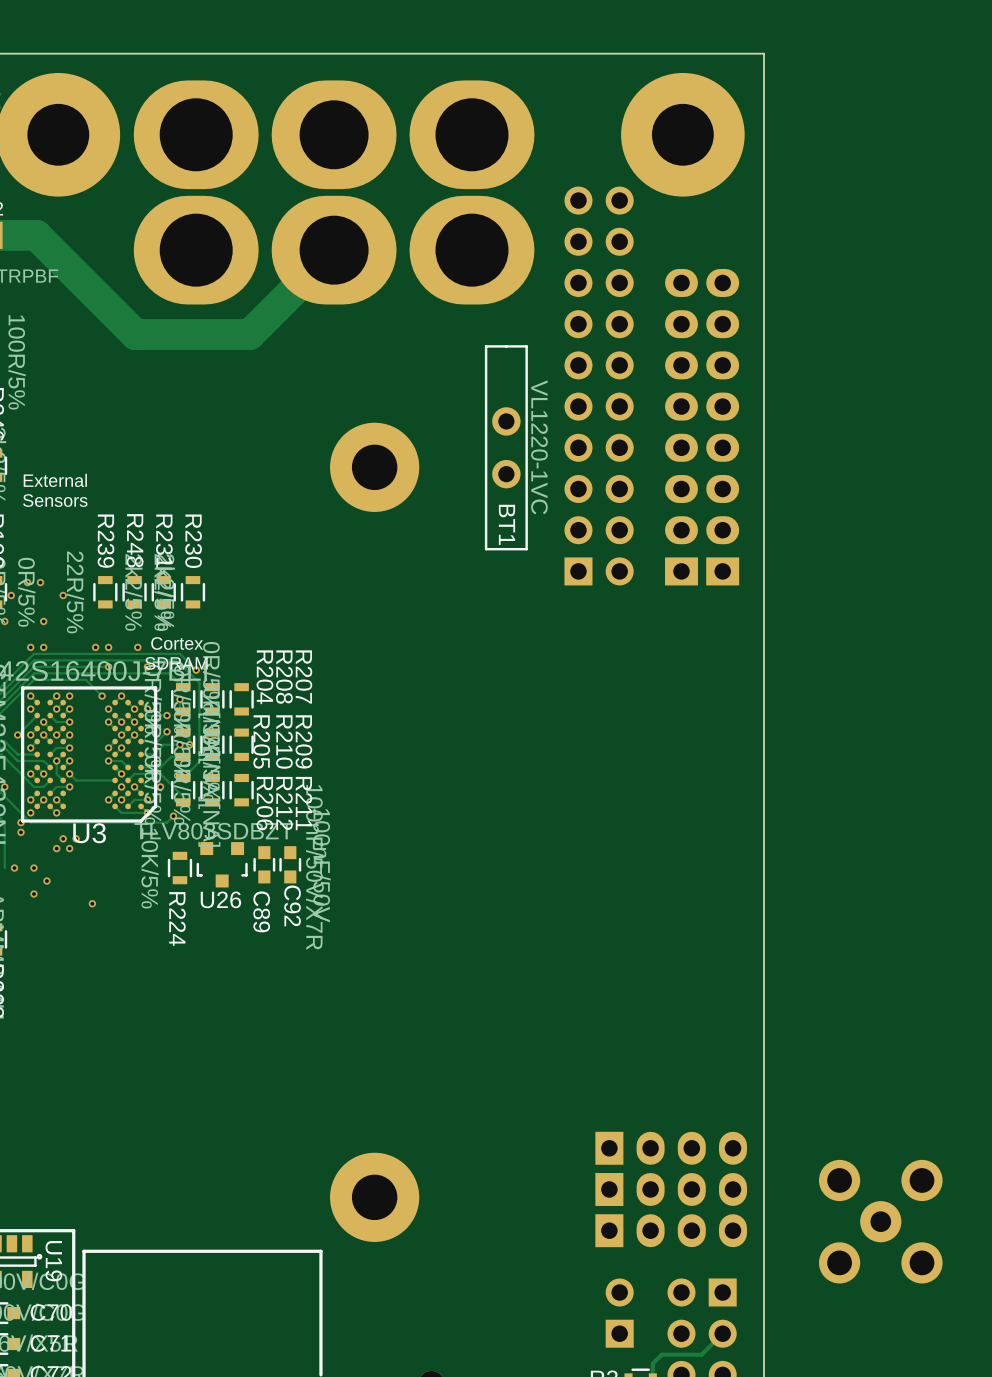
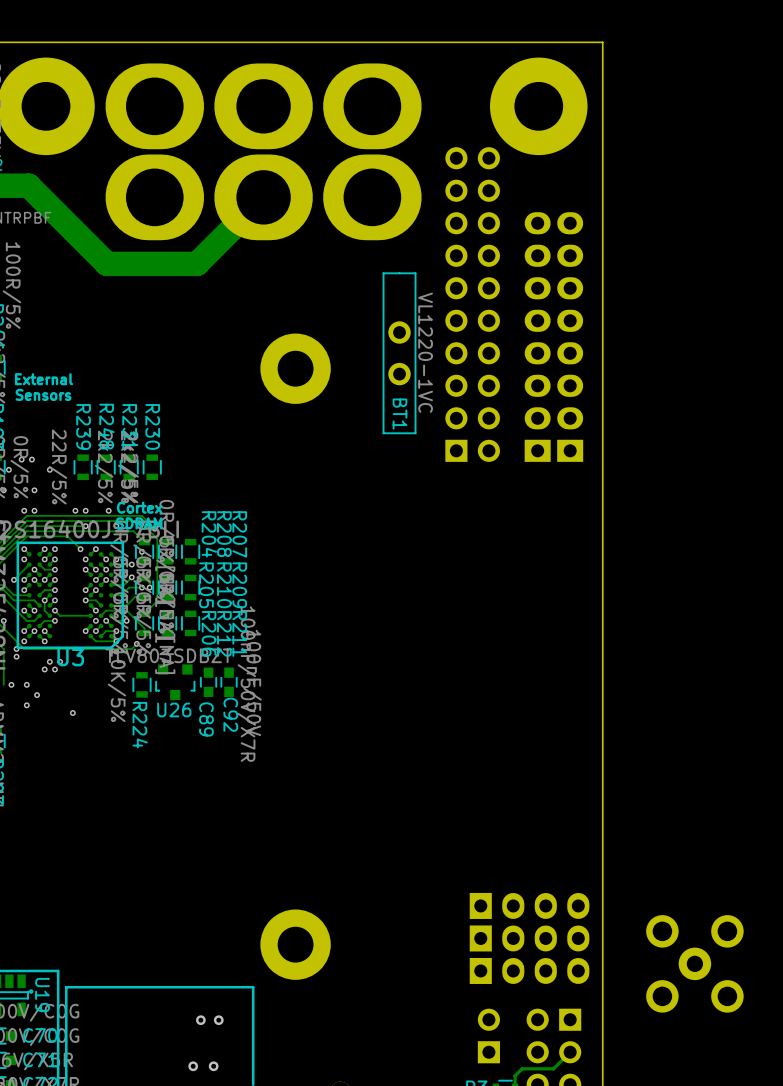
via: none -> (200, 1020)
via: none -> (218, 1020)
via: none -> (193, 1066)
via: none -> (213, 1066)

